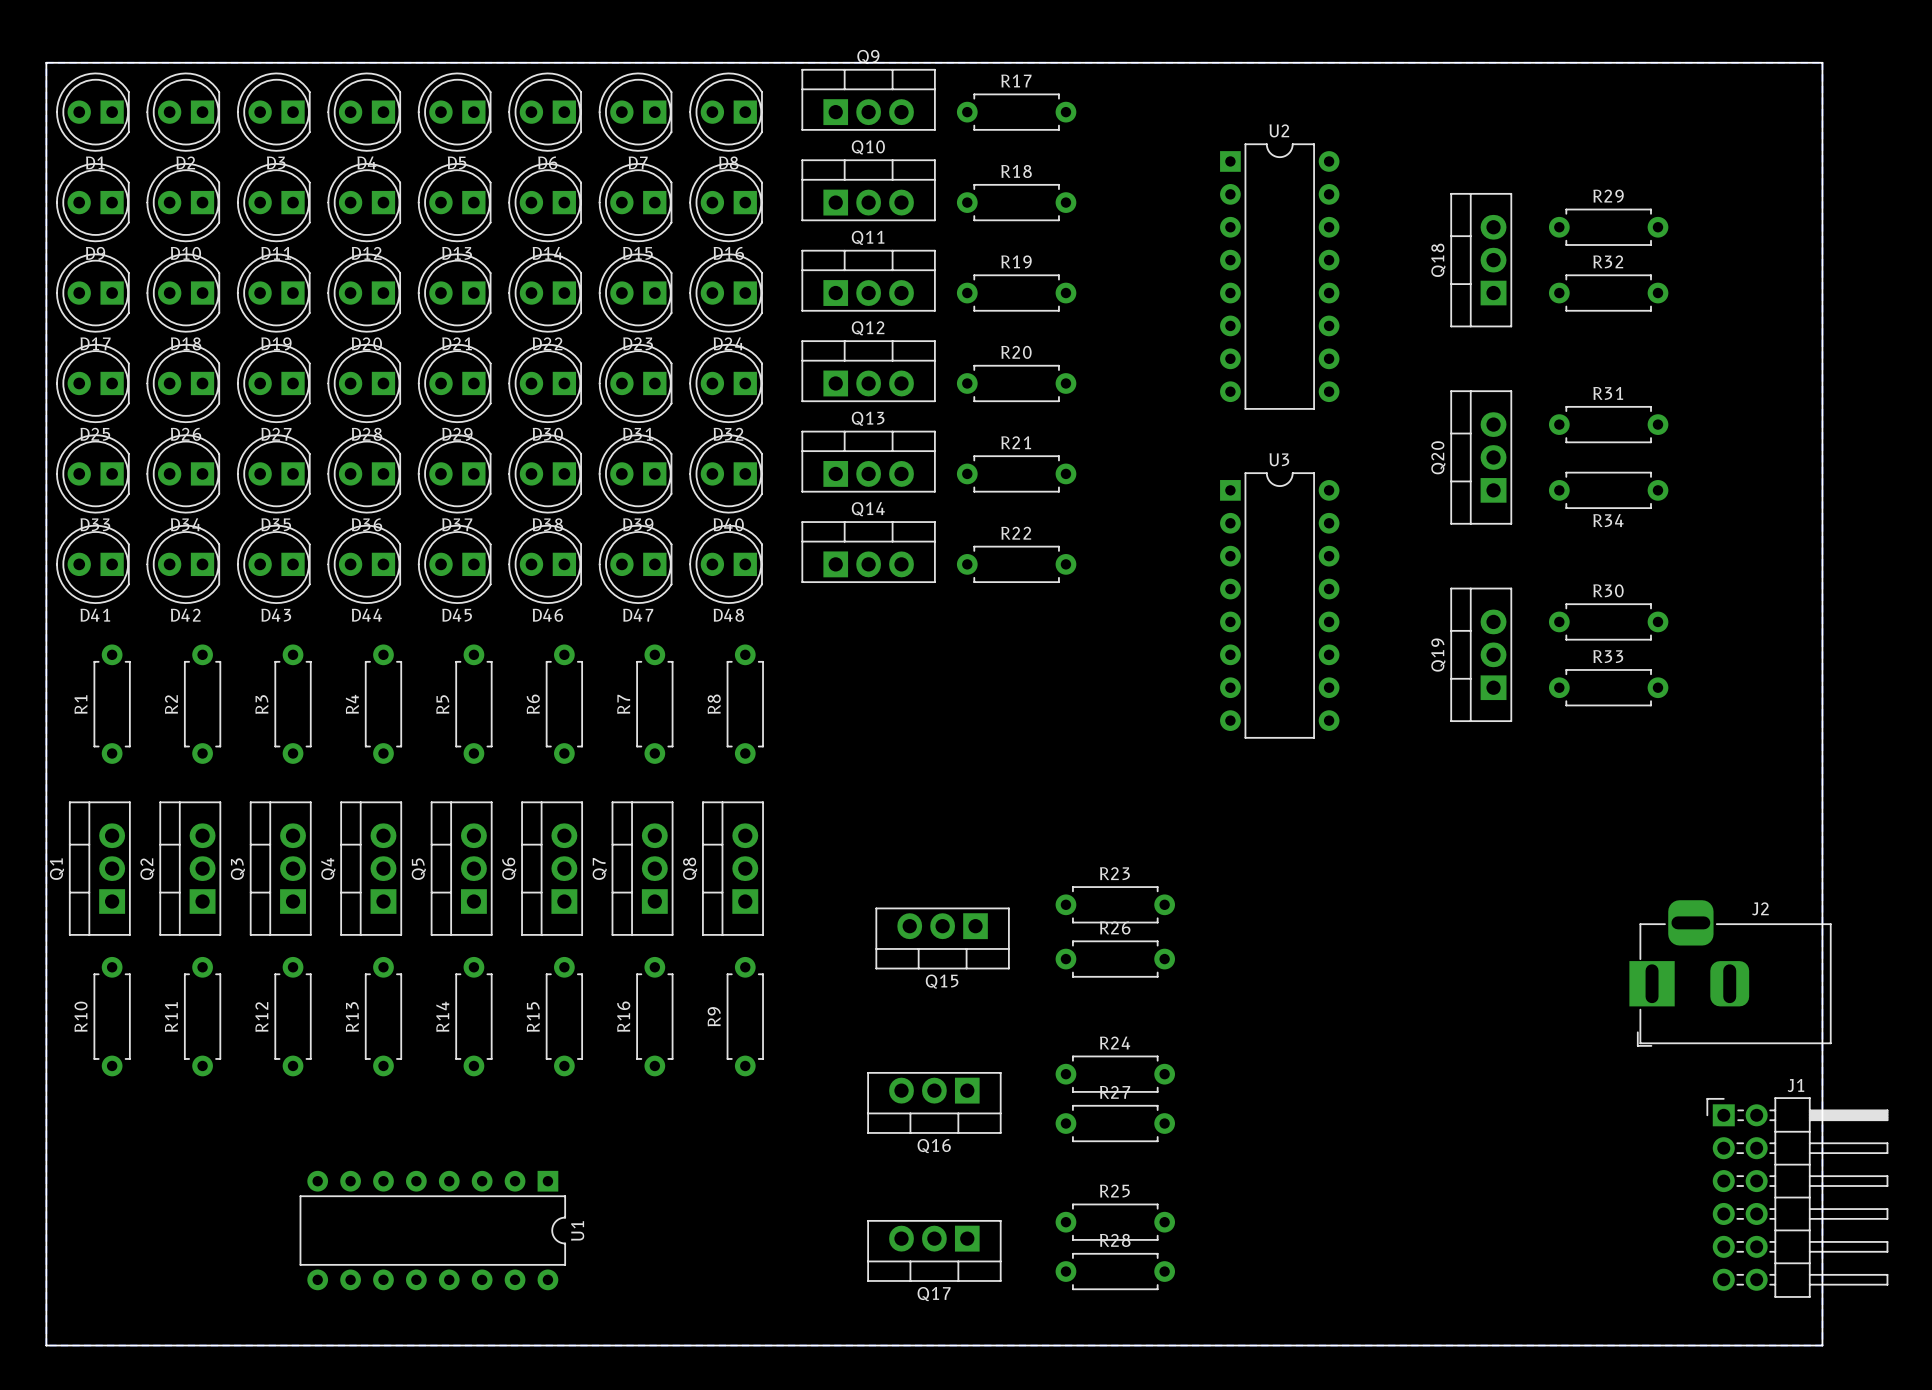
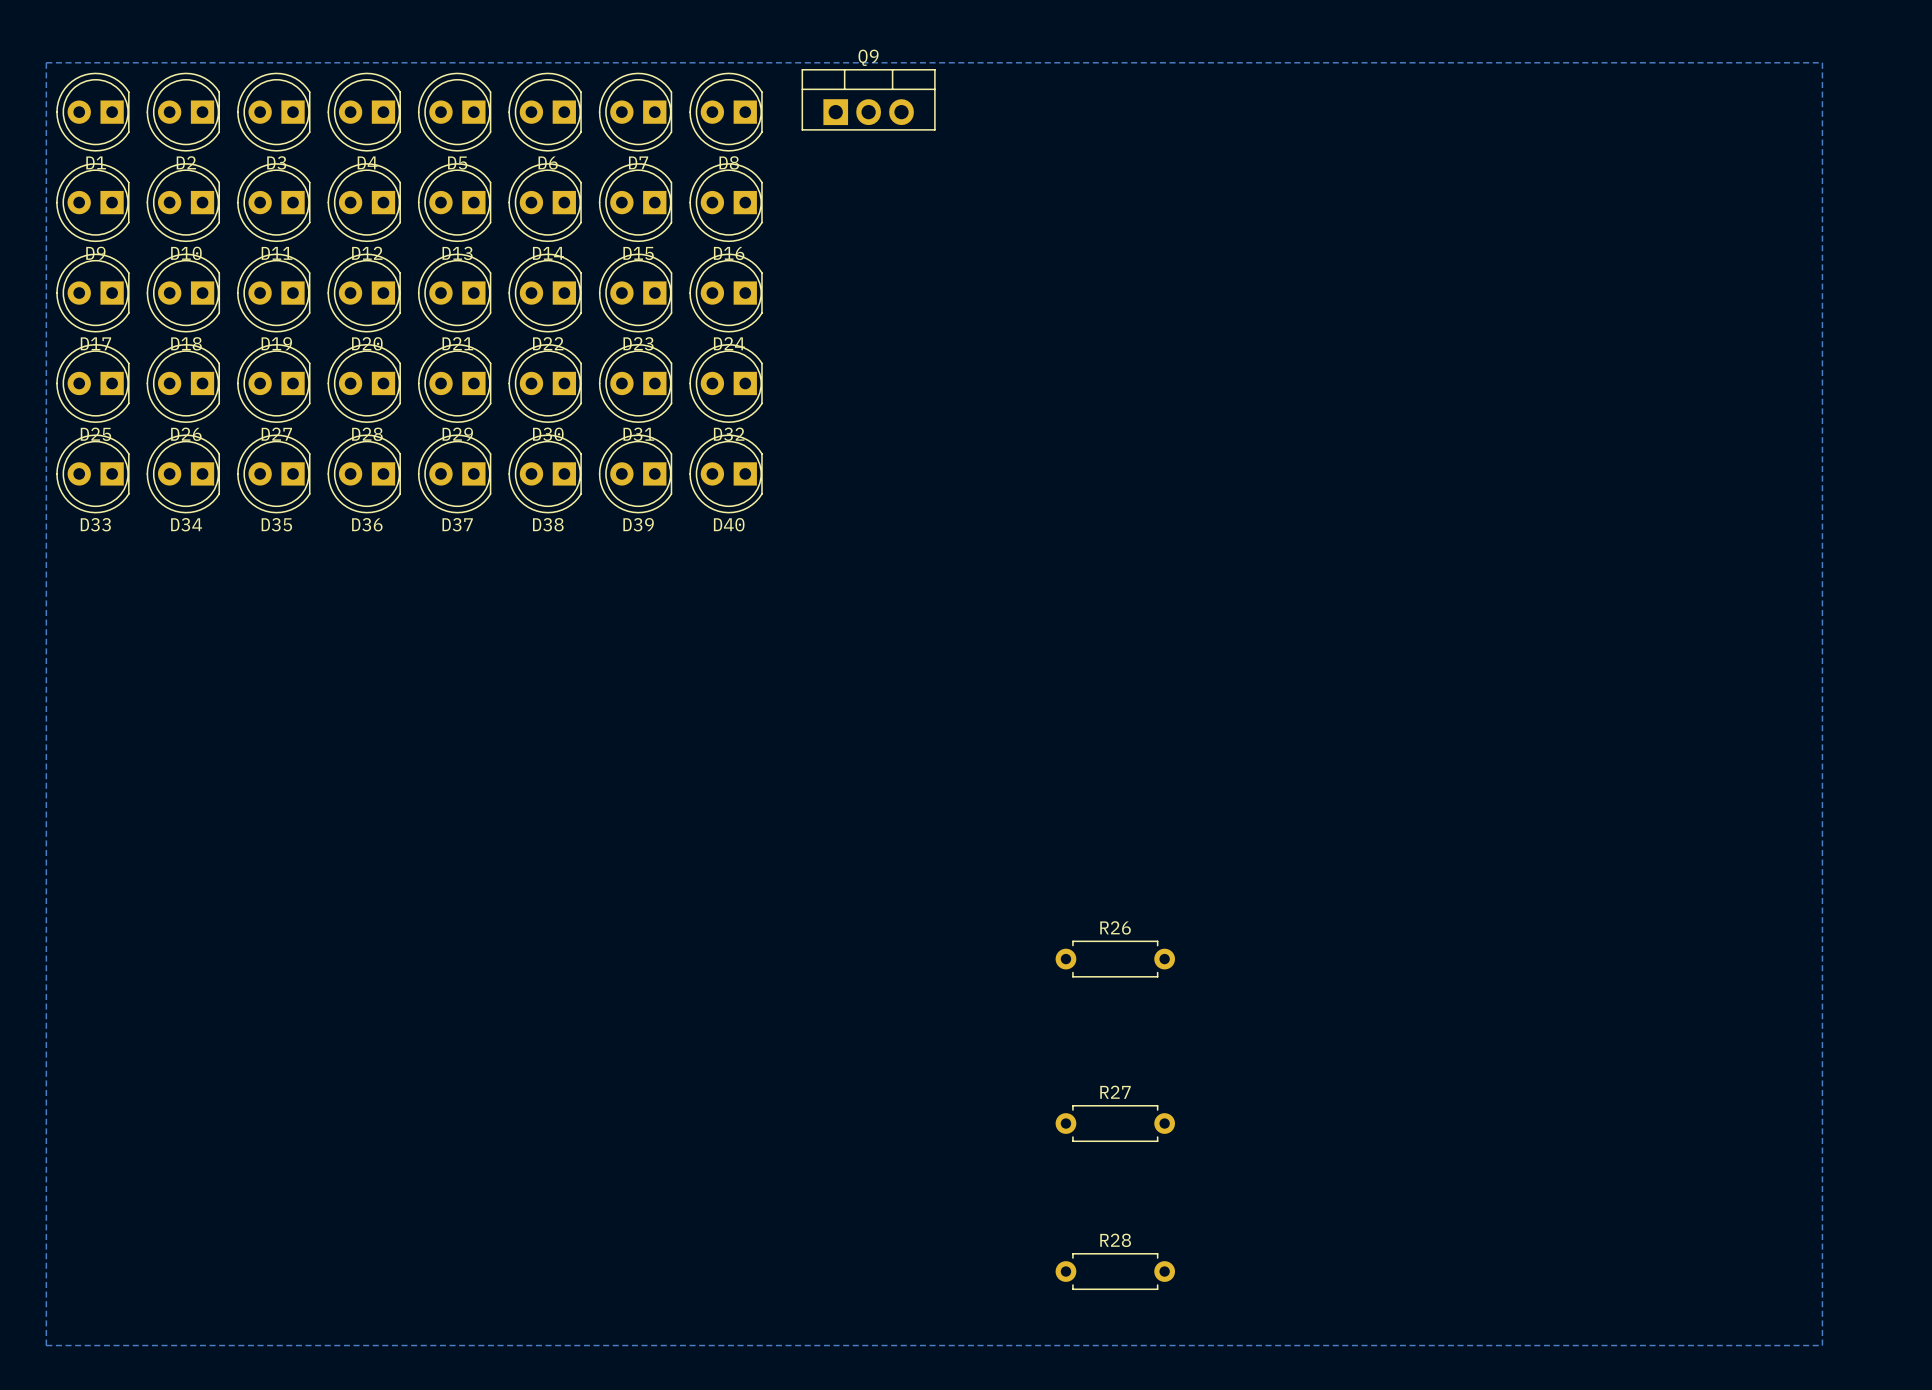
board edge: (46, 62) (1822, 62) (1822, 1345) (46, 1345) (46, 62) -> none
R17: (1016, 112) -> none
Q10: (868, 190) -> none
R18: (1016, 202) -> none
R29: (1608, 227) -> none
Q18: (1481, 260) -> none
U2: (1279, 276) -> none
Q11: (868, 280) -> none
R19: (1016, 293) -> none
R32: (1608, 293) -> none
Q12: (868, 371) -> none
R20: (1016, 383) -> none
R31: (1608, 424) -> none
Q20: (1481, 457) -> none
Q13: (868, 461) -> none
R21: (1016, 473) -> none
R34: (1608, 490) -> none
Q14: (868, 552) -> none
D41: (92, 564) -> none
D42: (183, 564) -> none
D43: (273, 564) -> none
D44: (364, 564) -> none
D45: (454, 564) -> none
D46: (545, 564) -> none
D47: (635, 564) -> none
D48: (726, 564) -> none
R22: (1016, 564) -> none
U3: (1279, 605) -> none
R30: (1608, 621) -> none
Q19: (1481, 654) -> none
R33: (1608, 687) -> none
R1: (112, 704) -> none
R2: (202, 704) -> none
R3: (293, 704) -> none
R4: (383, 704) -> none
R5: (473, 704) -> none
R6: (564, 704) -> none
R7: (654, 704) -> none
R8: (745, 704) -> none
Q1: (99, 868) -> none
Q2: (190, 868) -> none
Q3: (280, 868) -> none
Q4: (371, 868) -> none
Q5: (461, 868) -> none
Q6: (552, 868) -> none
Q7: (642, 868) -> none
Q8: (732, 868) -> none
R23: (1115, 904) -> none
Q15: (942, 938) -> none
J2: (1730, 973) -> none
R10: (112, 1016) -> none
R11: (202, 1016) -> none
R12: (293, 1016) -> none
R13: (383, 1016) -> none
R14: (473, 1016) -> none
R15: (564, 1016) -> none
R16: (654, 1016) -> none
R9: (745, 1016) -> none
R24: (1115, 1074) -> none
Q16: (934, 1102) -> none
J1: (1797, 1197) -> none
R25: (1115, 1222) -> none
U1: (432, 1230) -> none
Q17: (934, 1250) -> none

